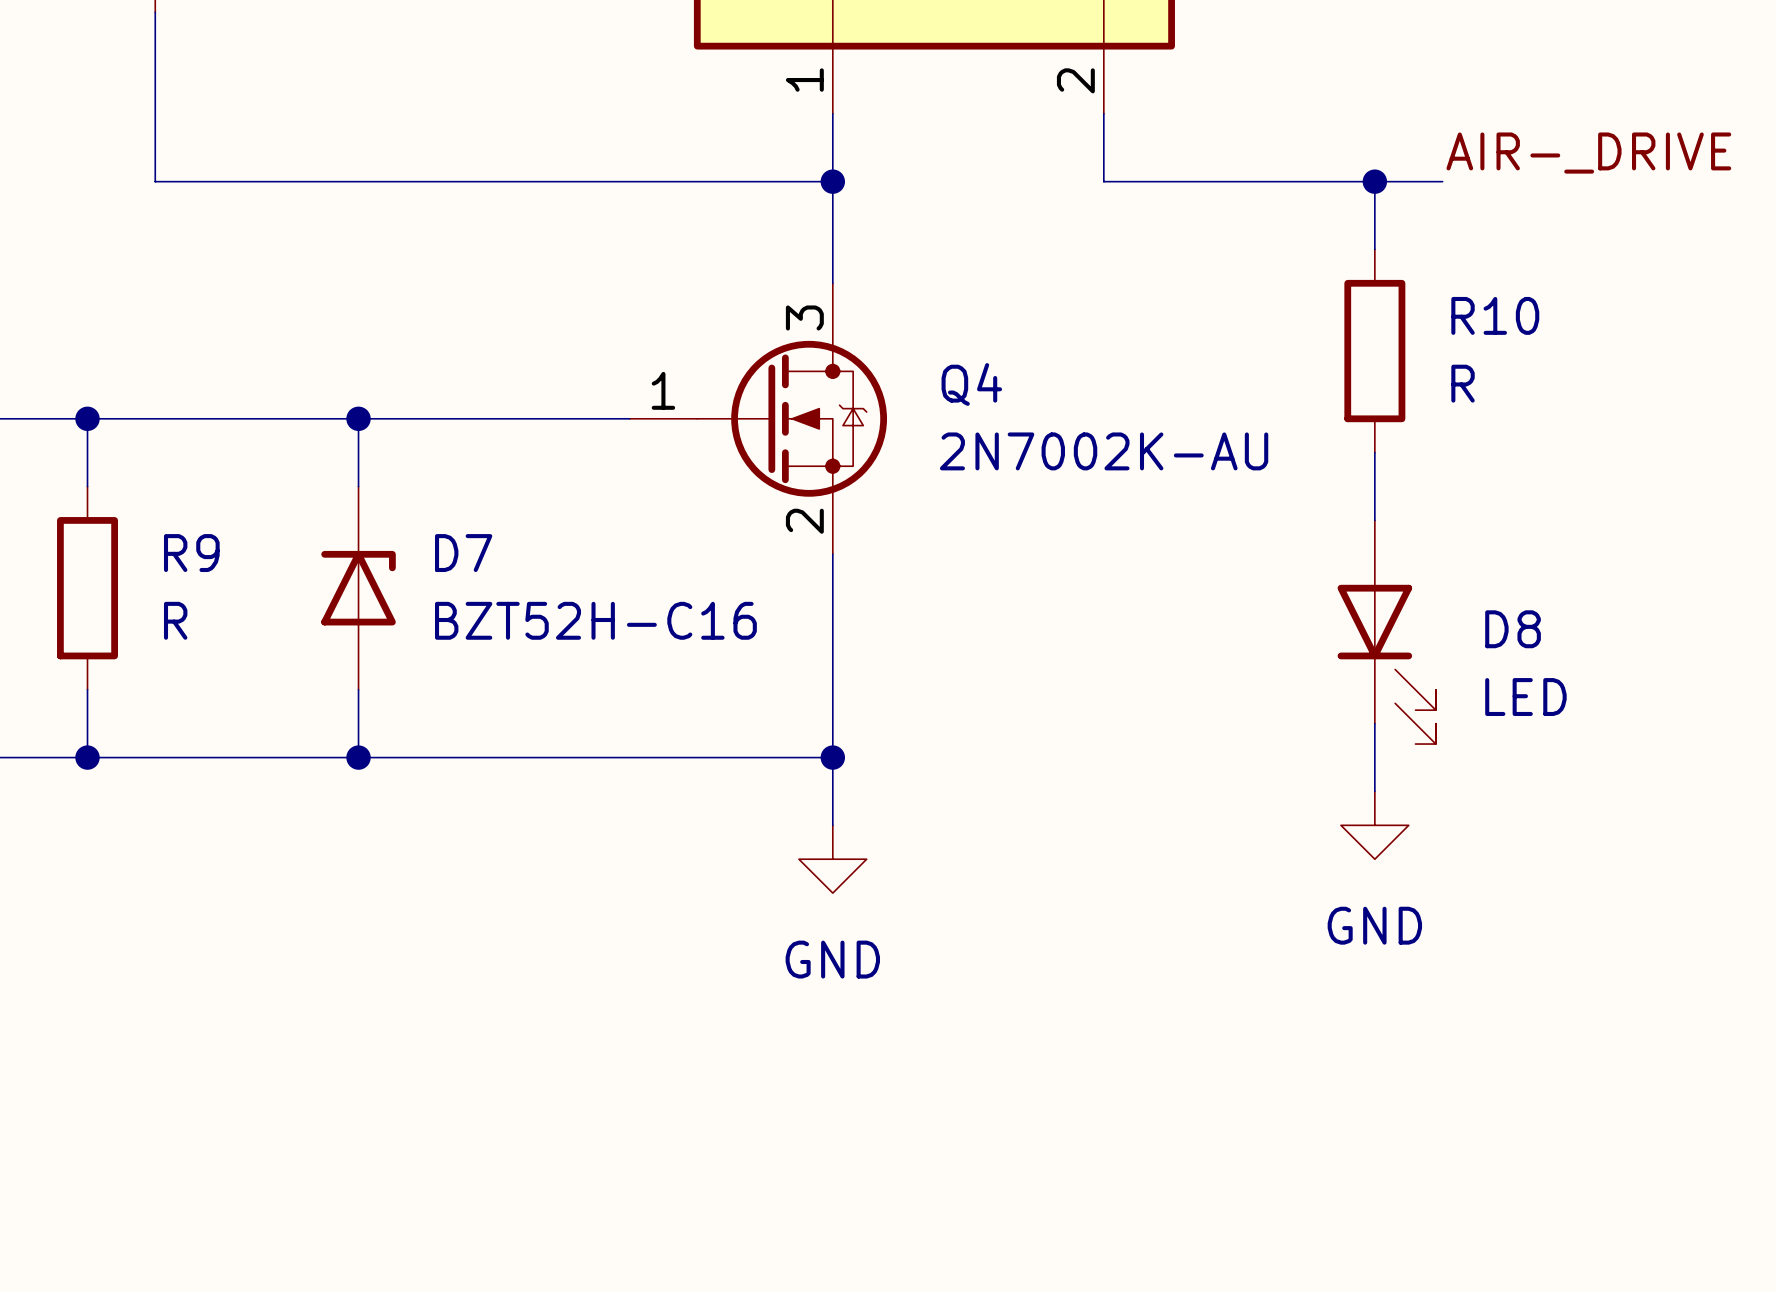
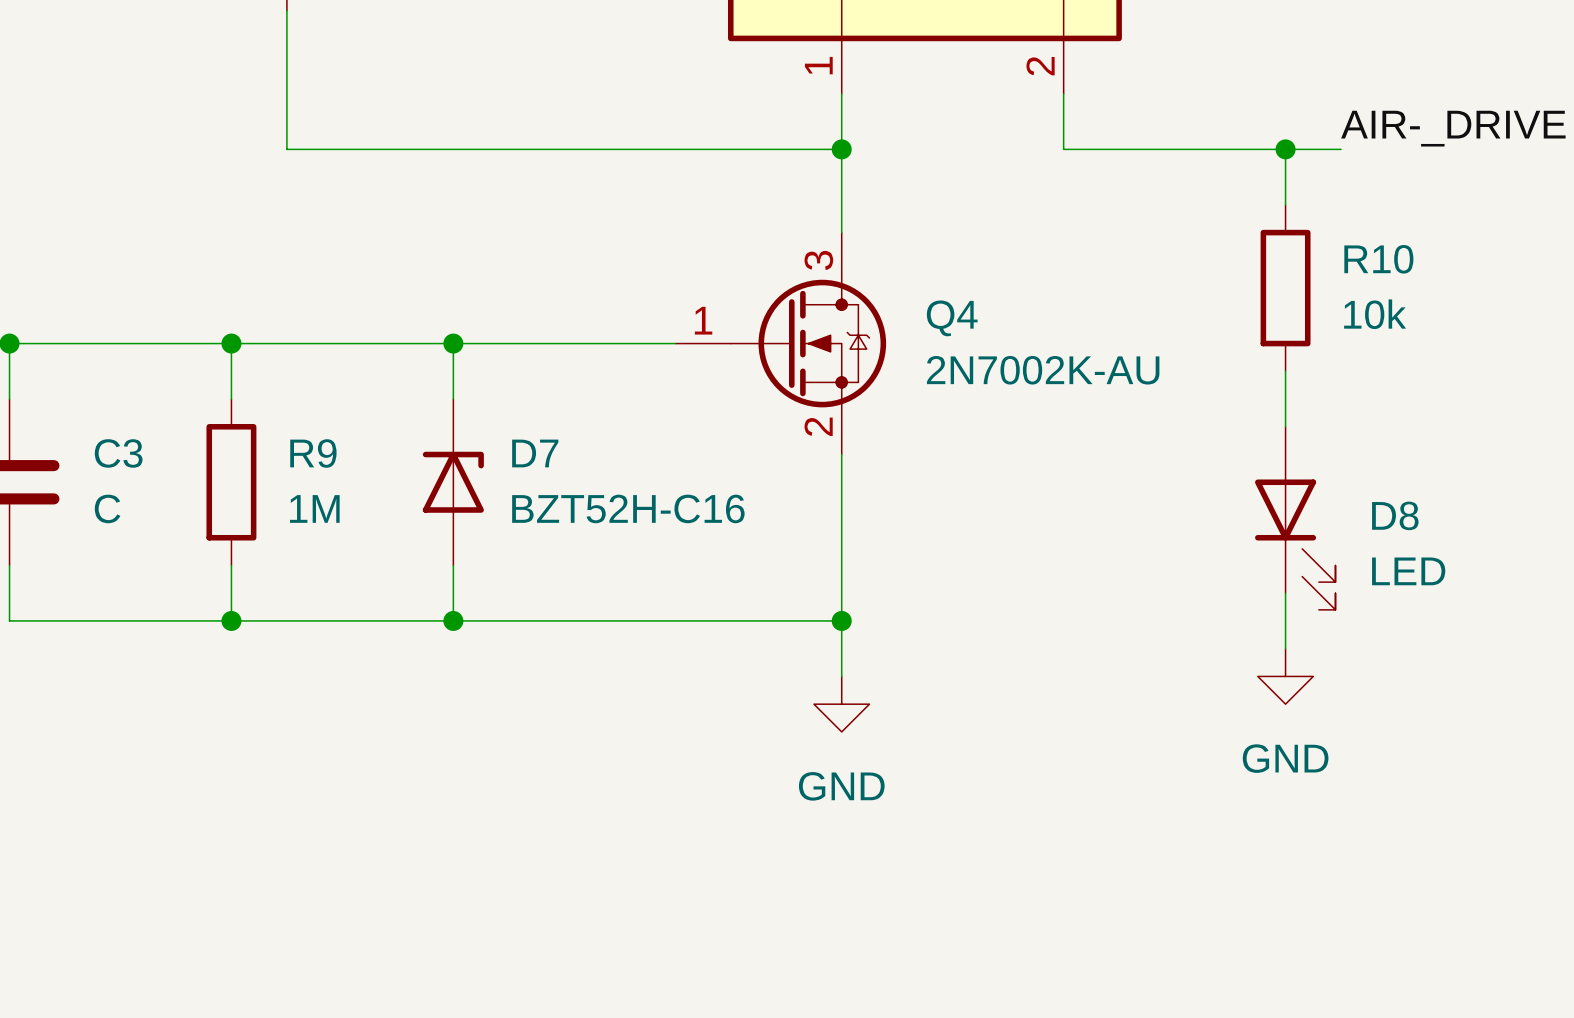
R10 value: R (1463, 383) -> 10k (1375, 314)
R9 value: R (175, 620) -> 1M (314, 508)

